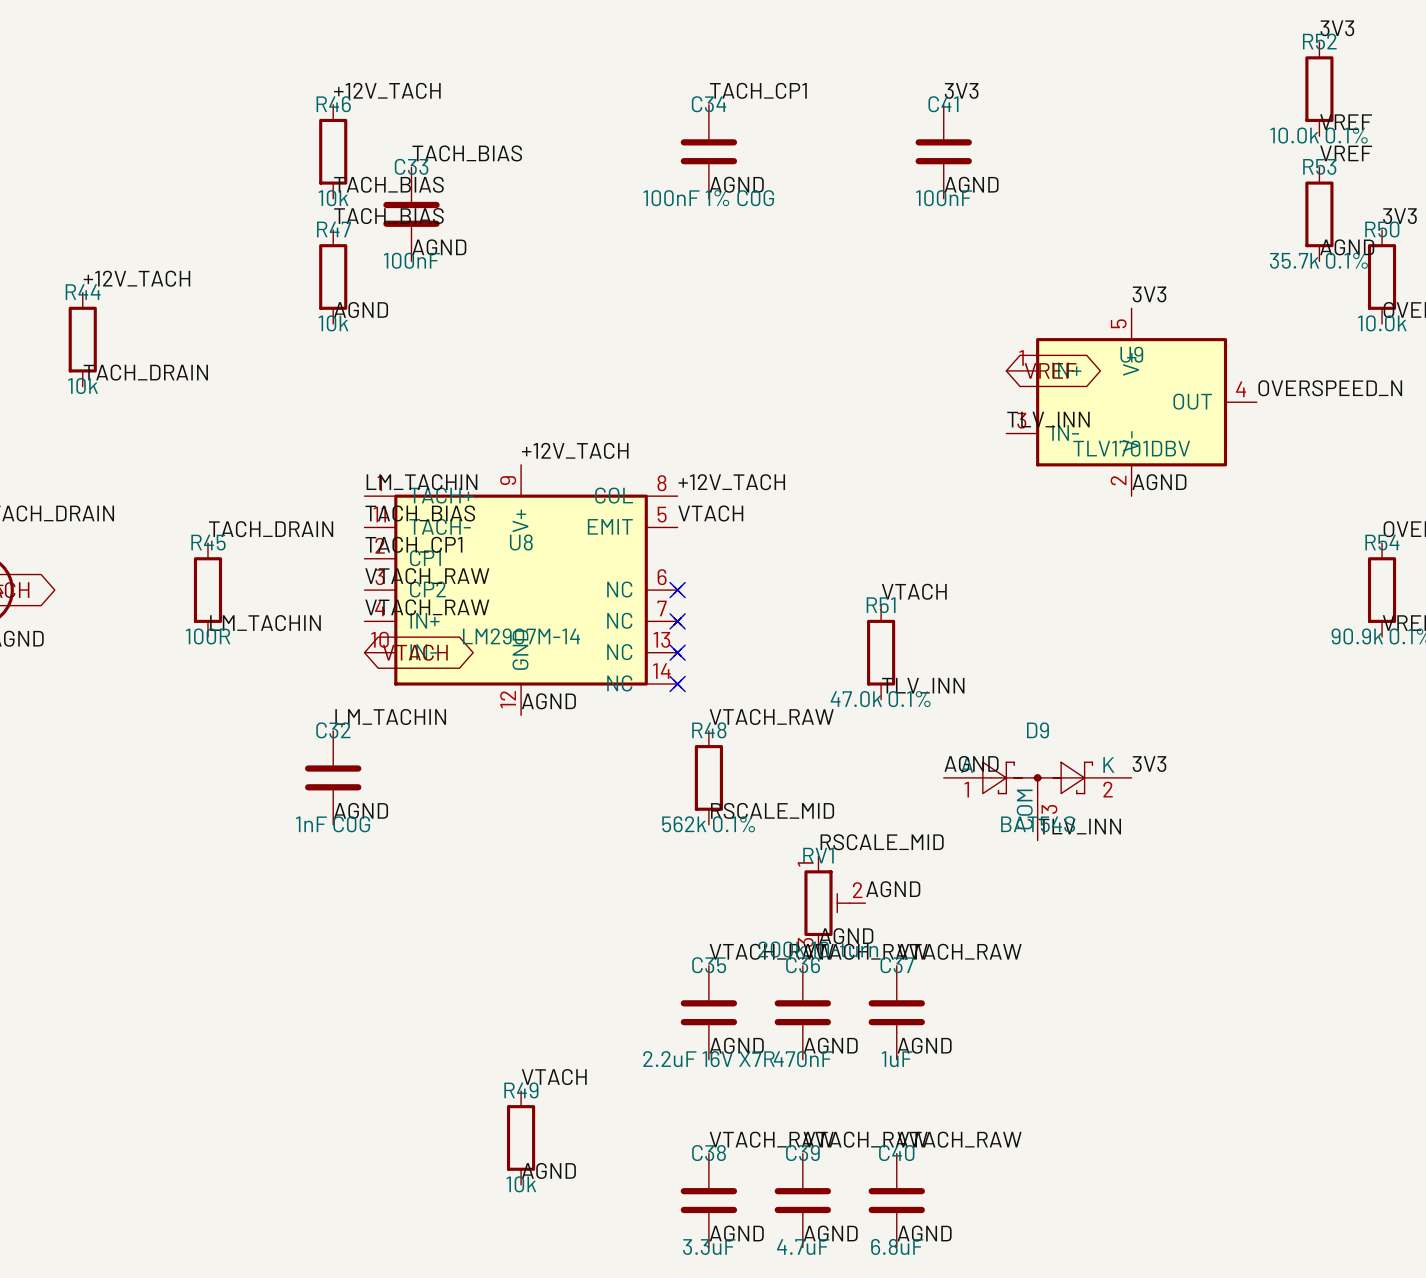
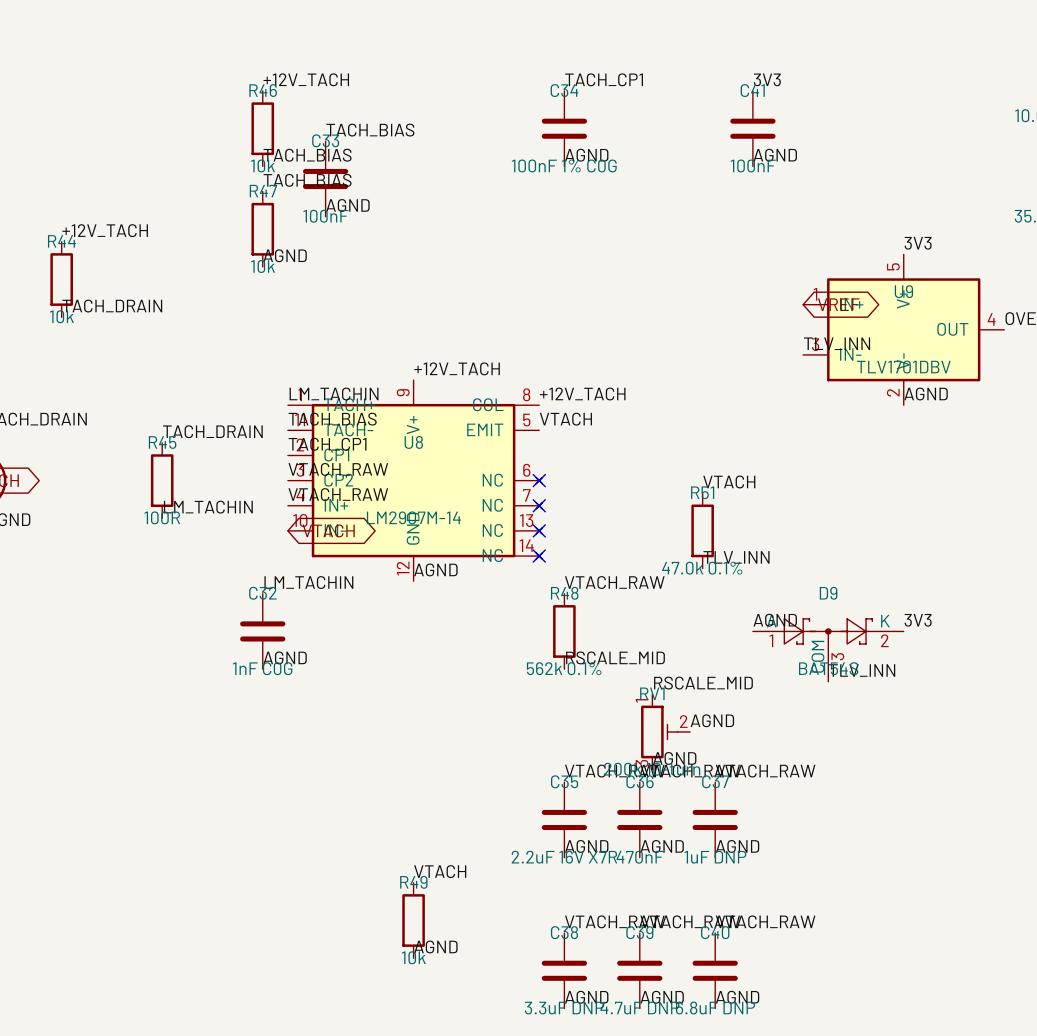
C37 value: 1uF (897, 1059) -> 1uF DNP (715, 857)
C40 value: 6.8uF (897, 1246) -> 6.8uF DNP (715, 1007)
C38 value: 3.3uF (709, 1247) -> 3.3uF DNP (564, 1008)
C39 value: 4.7uF (803, 1247) -> 4.7uF DNP (639, 1008)

